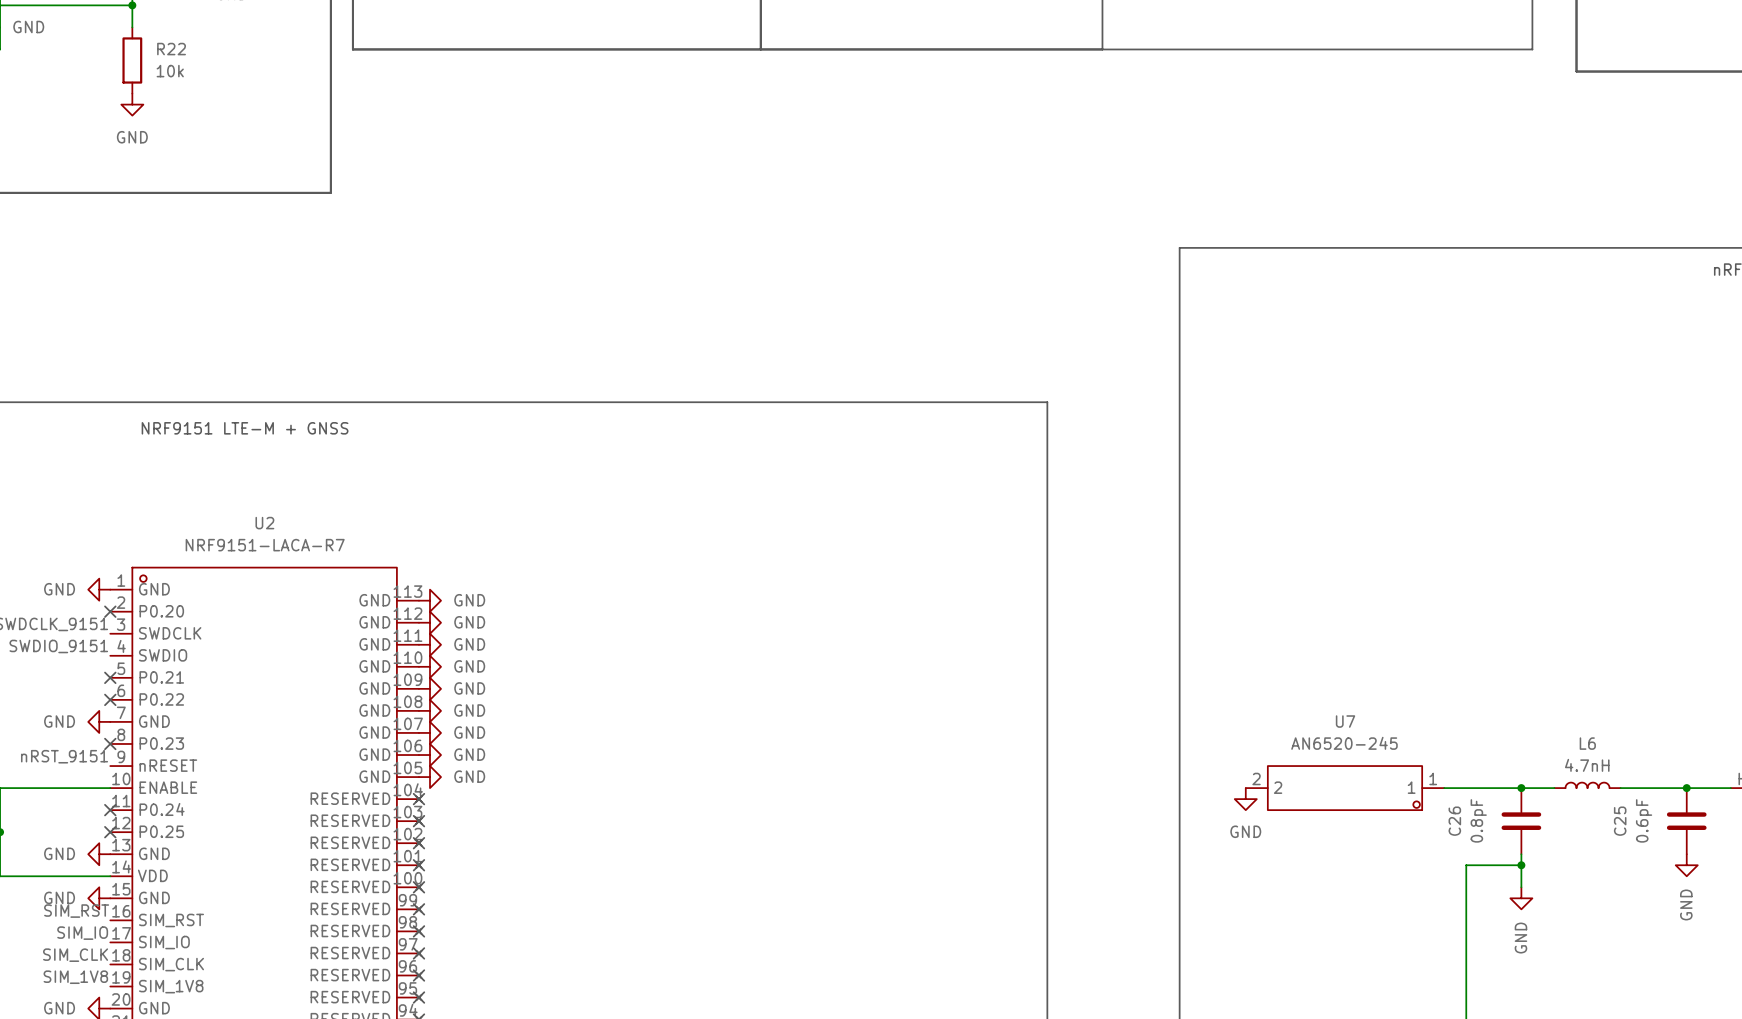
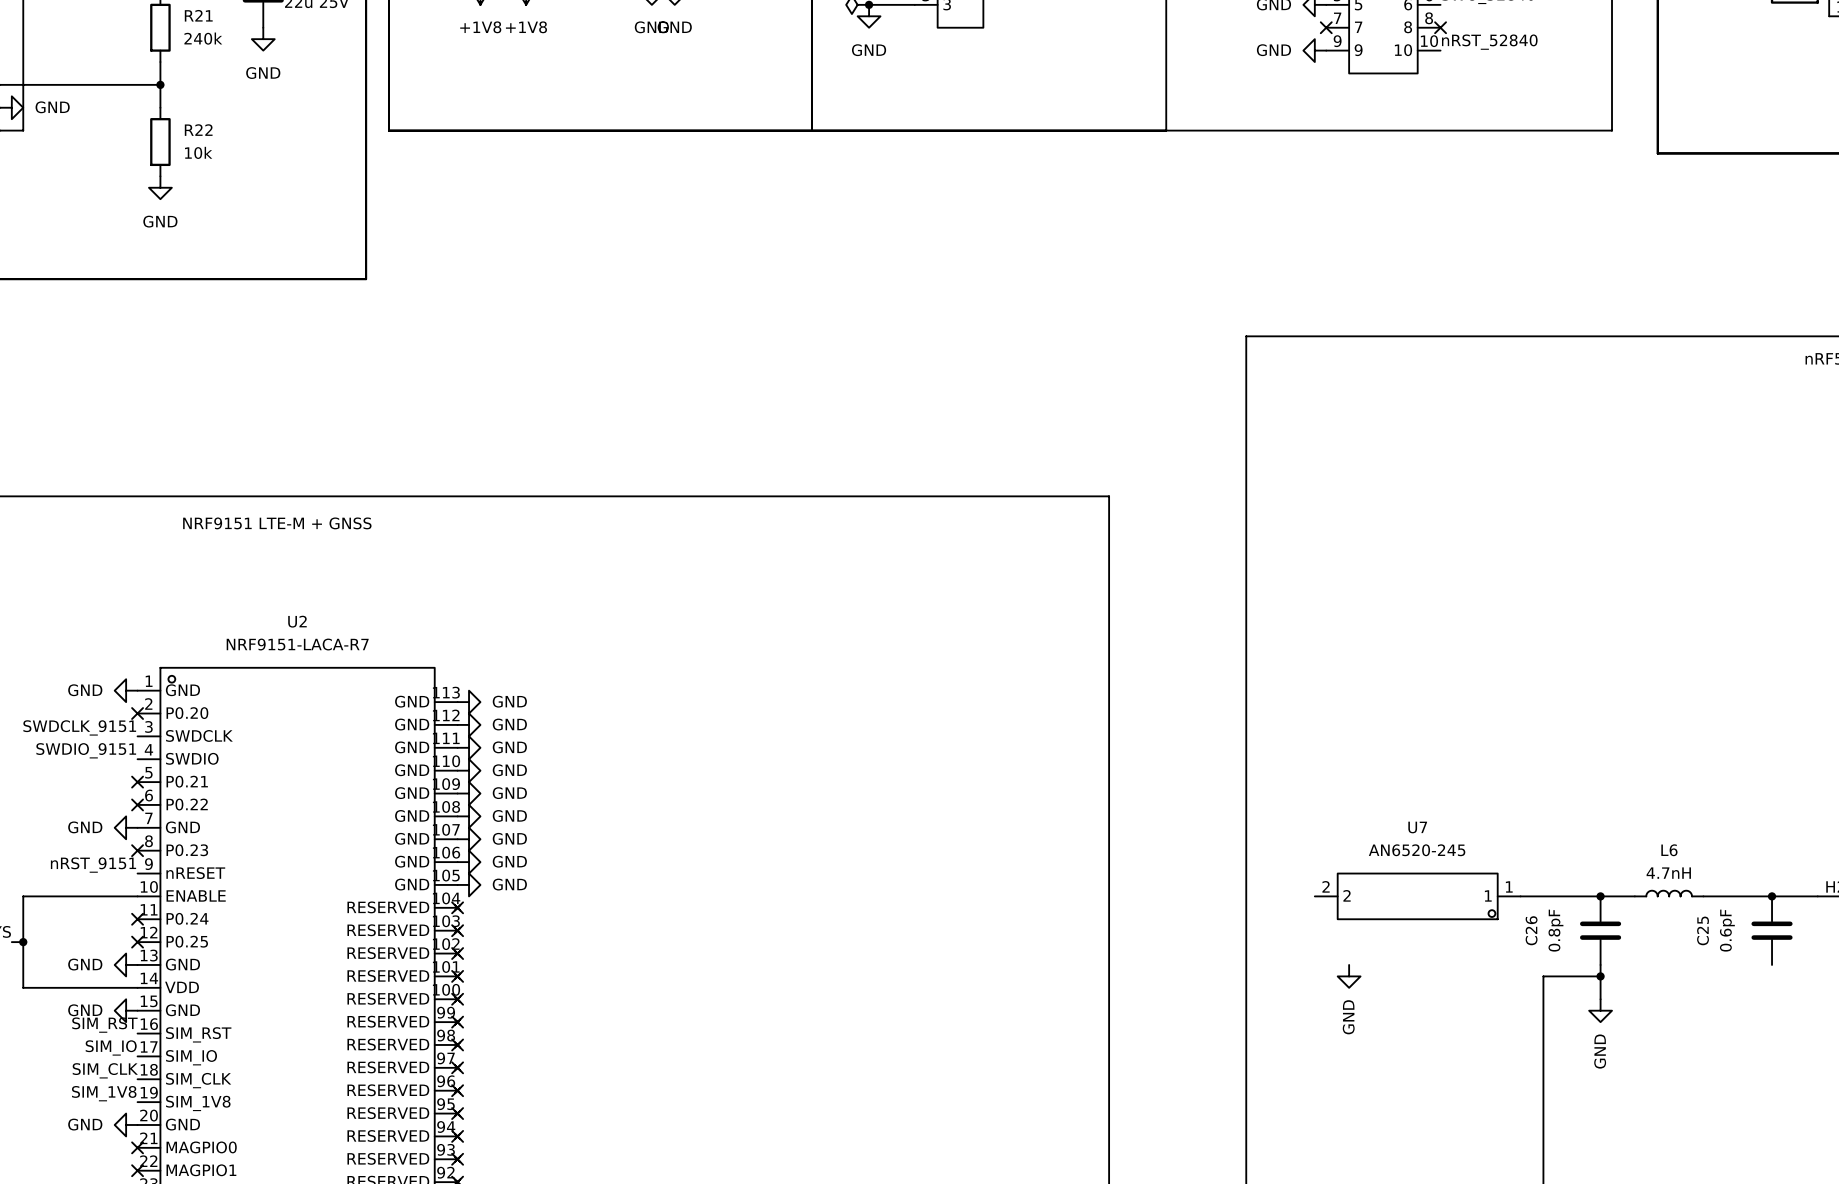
power symbol position: GND (1245, 799) -> GND (1349, 976)
power symbol text rotation: 0° (1245, 831) -> 90° counterclockwise (1348, 1017)
power symbol: GND (1686, 865) -> none

